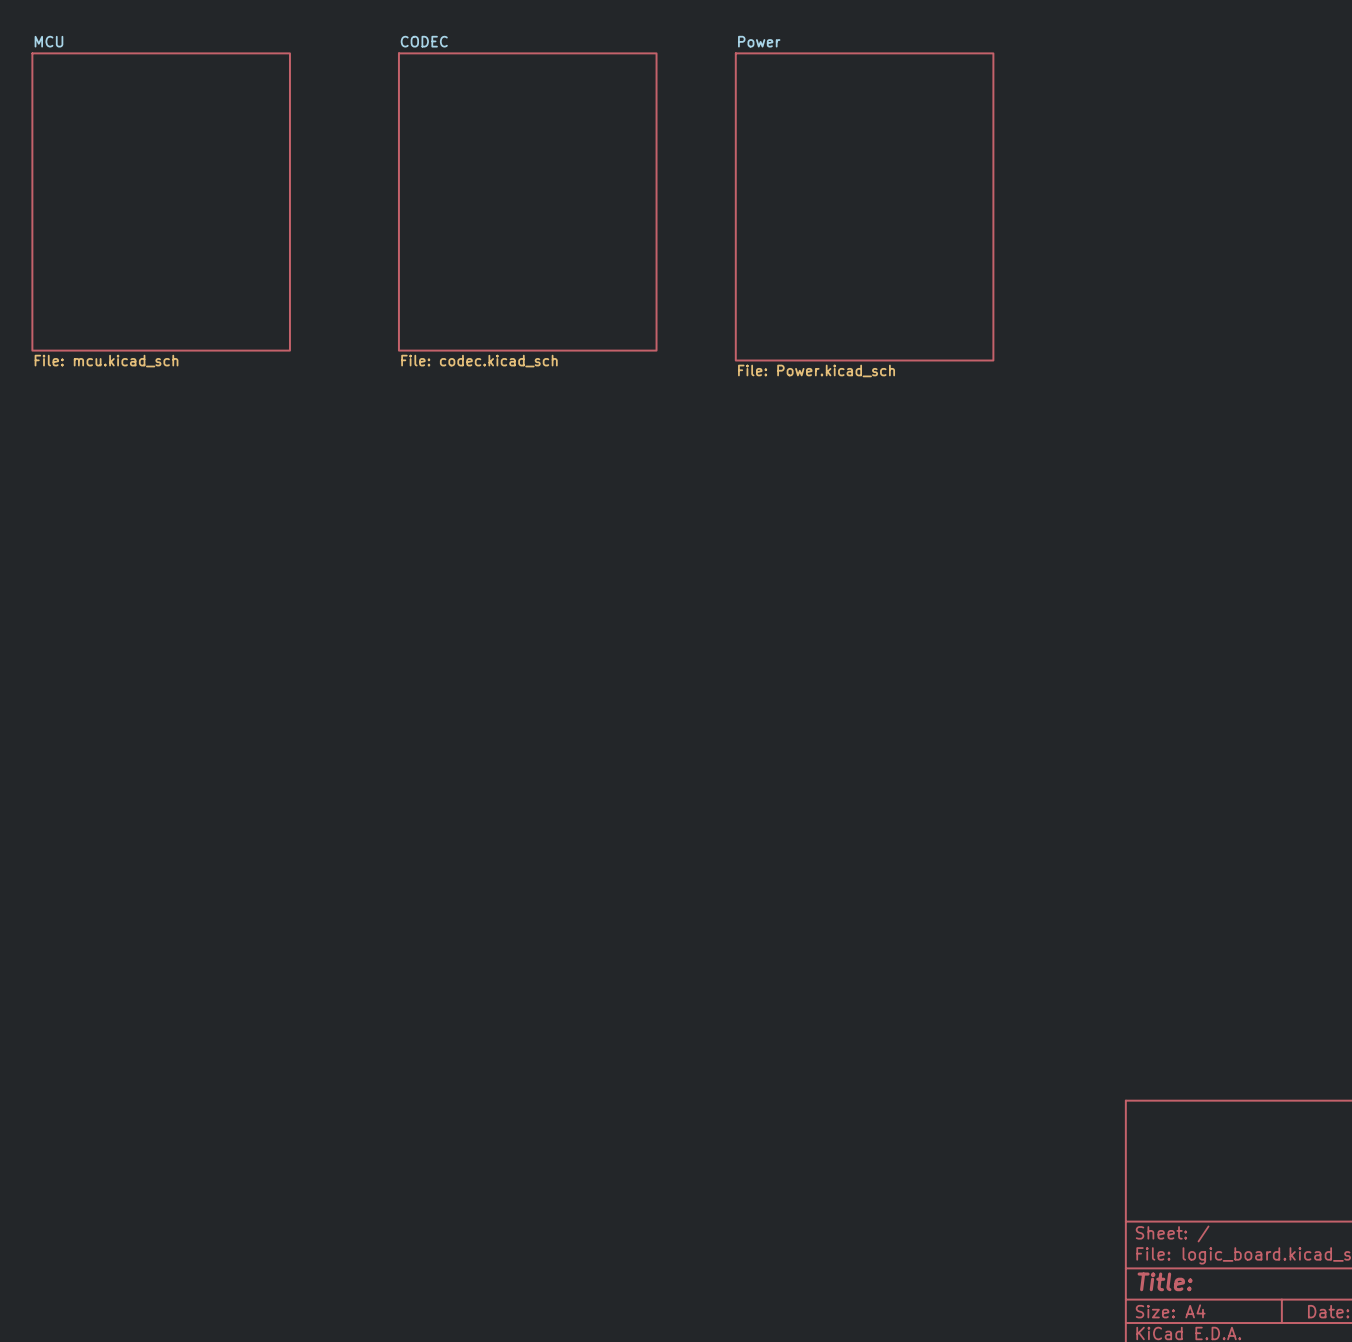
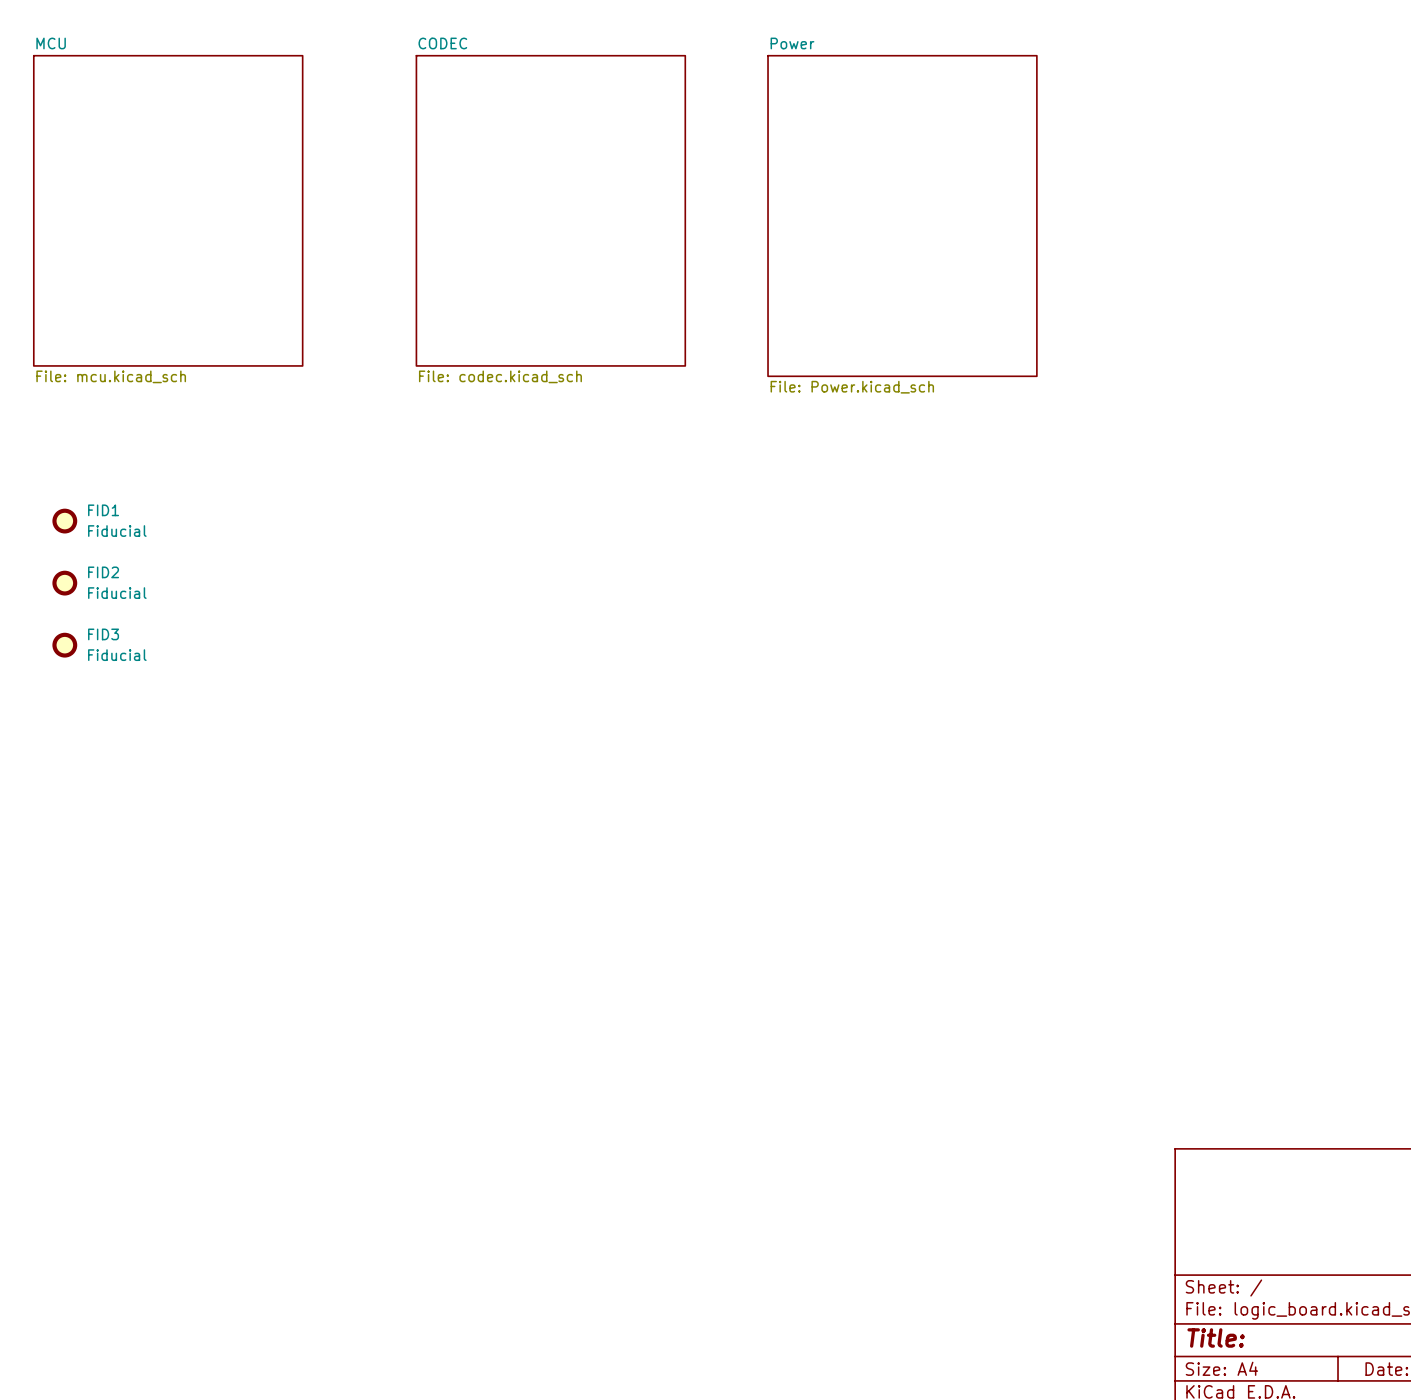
FID1: none -> Fiducial (64, 521)
FID2: none -> Fiducial (64, 583)
FID3: none -> Fiducial (64, 645)

